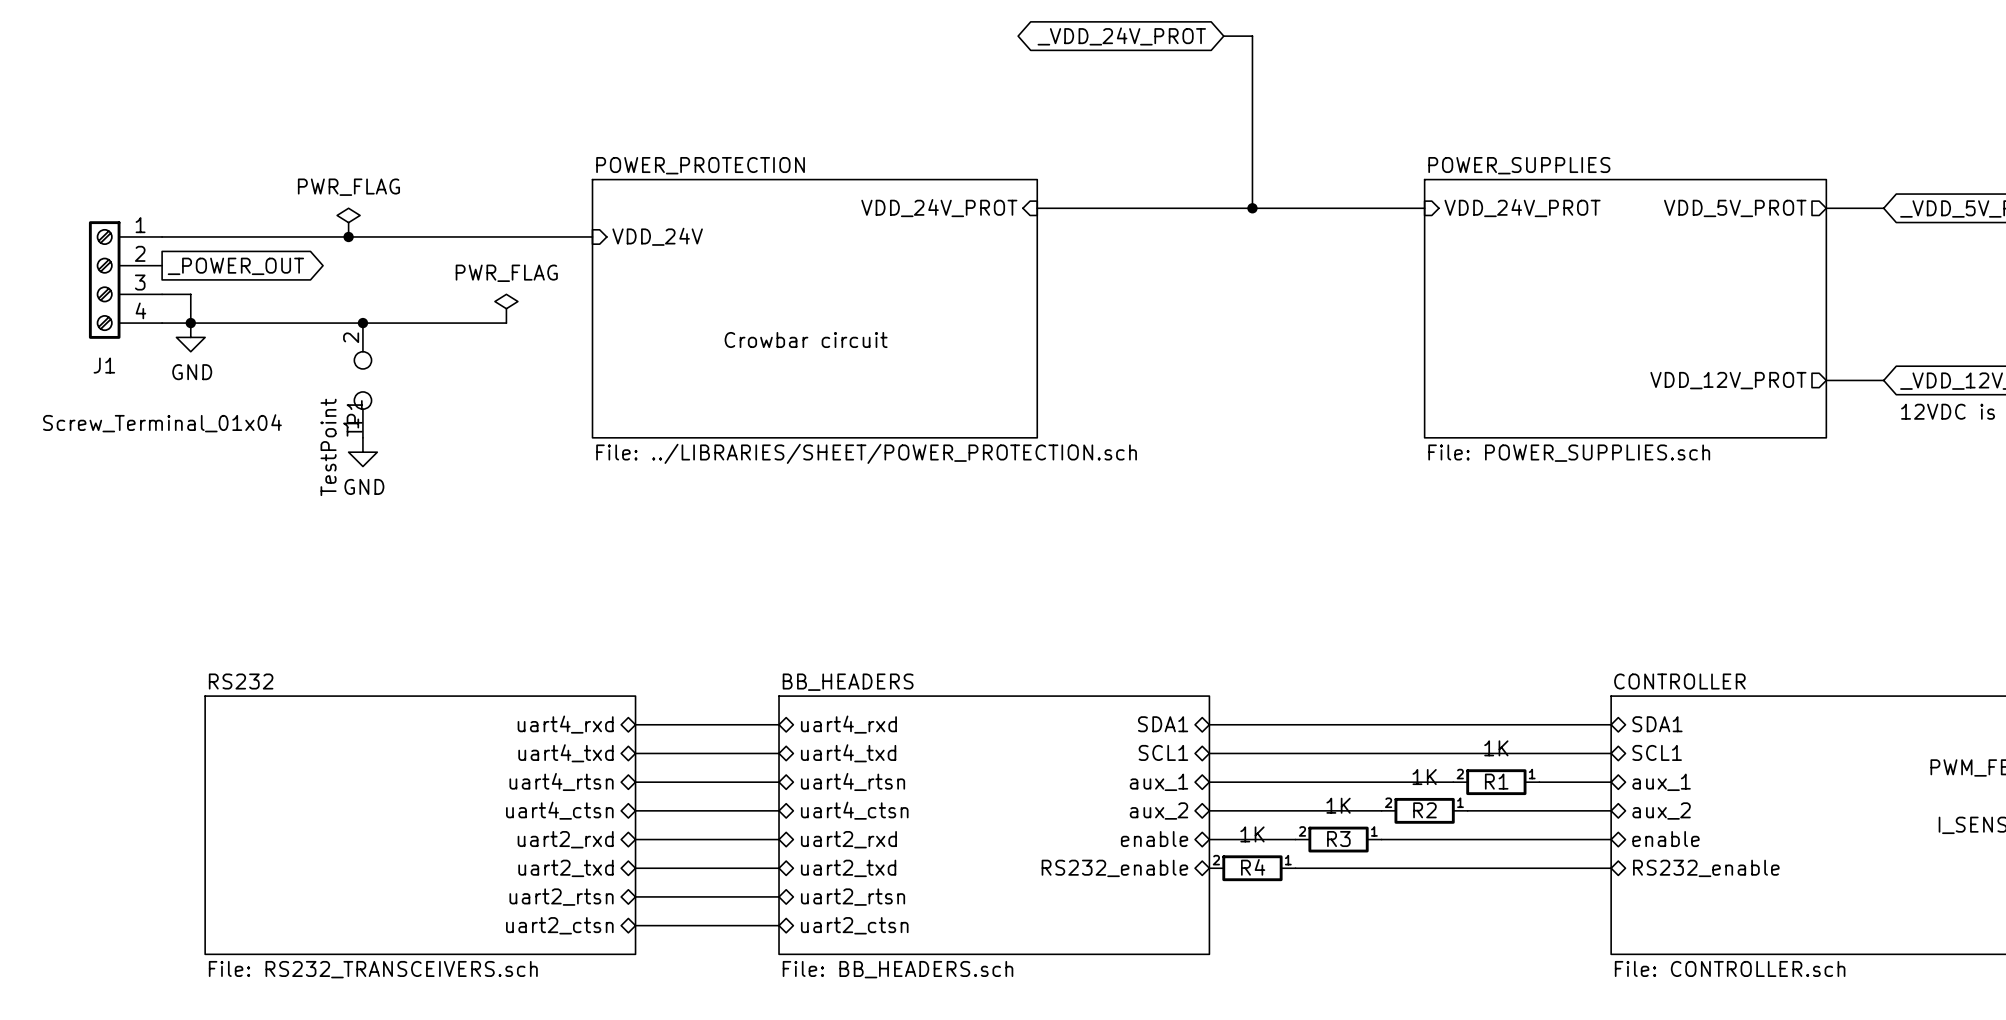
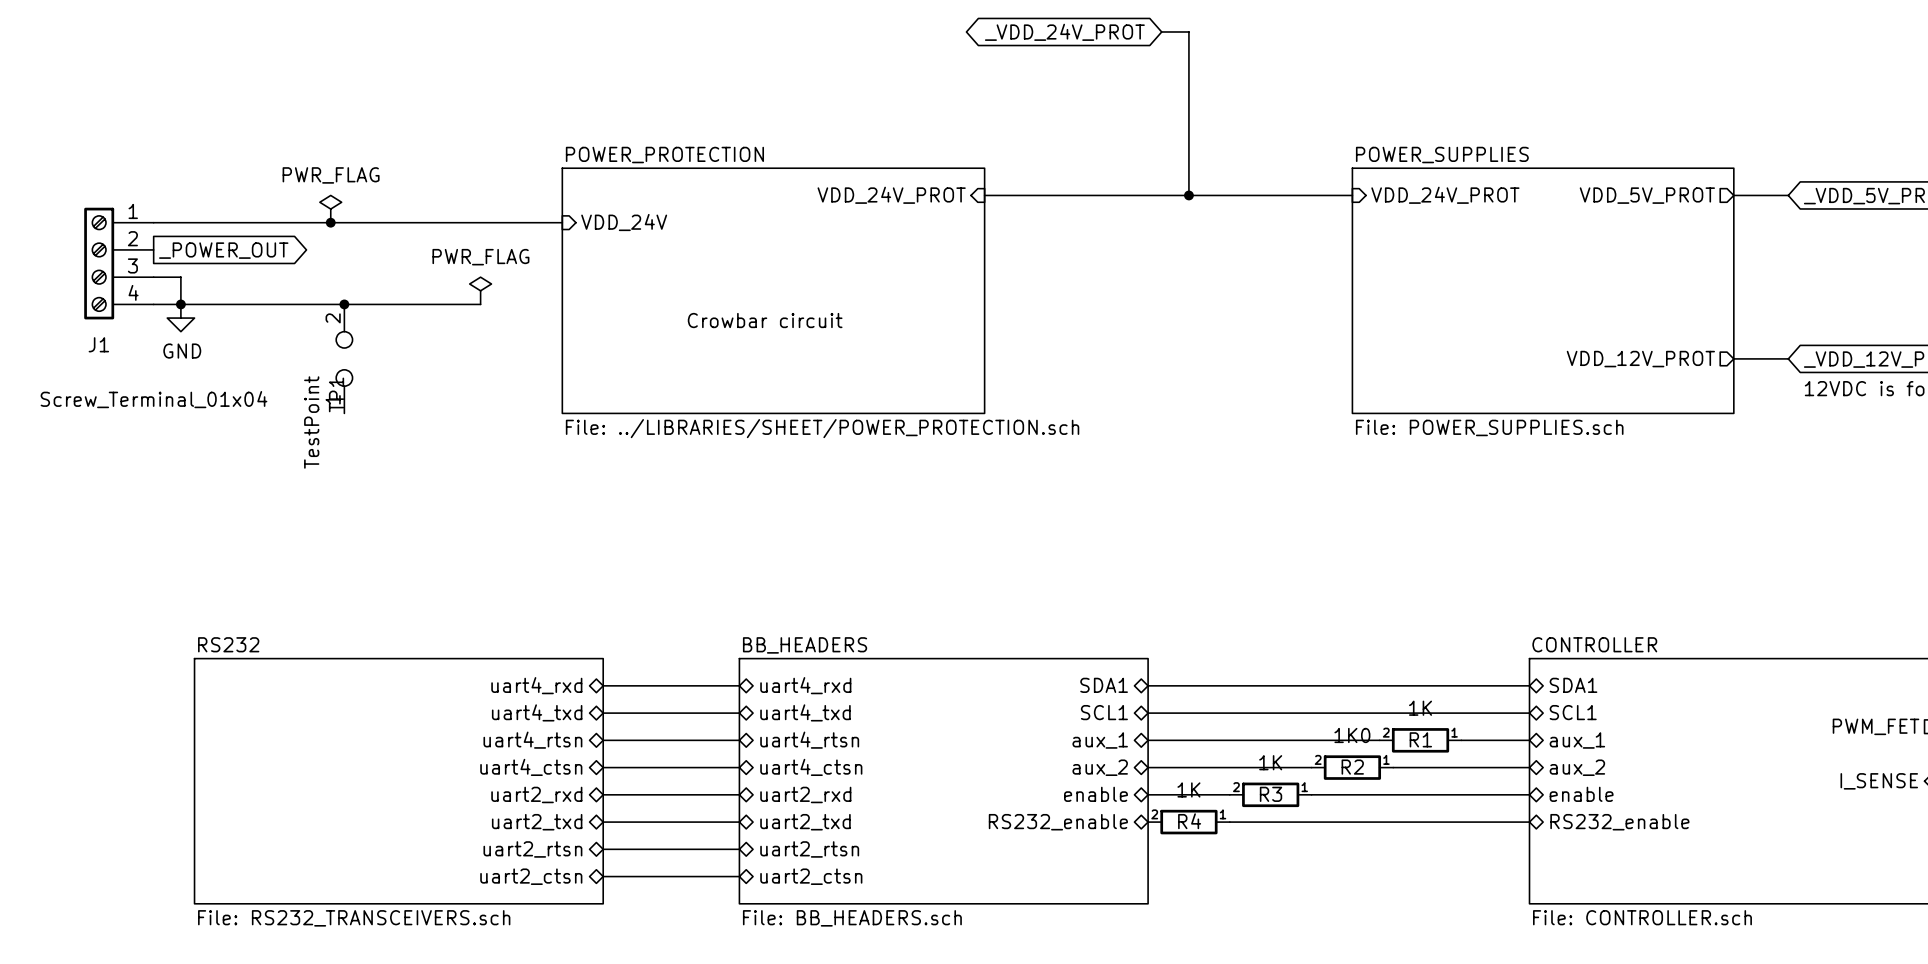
power symbol: GND (362, 452) -> none
R2 value: 1K (1424, 777) -> 1K0 (1352, 735)

